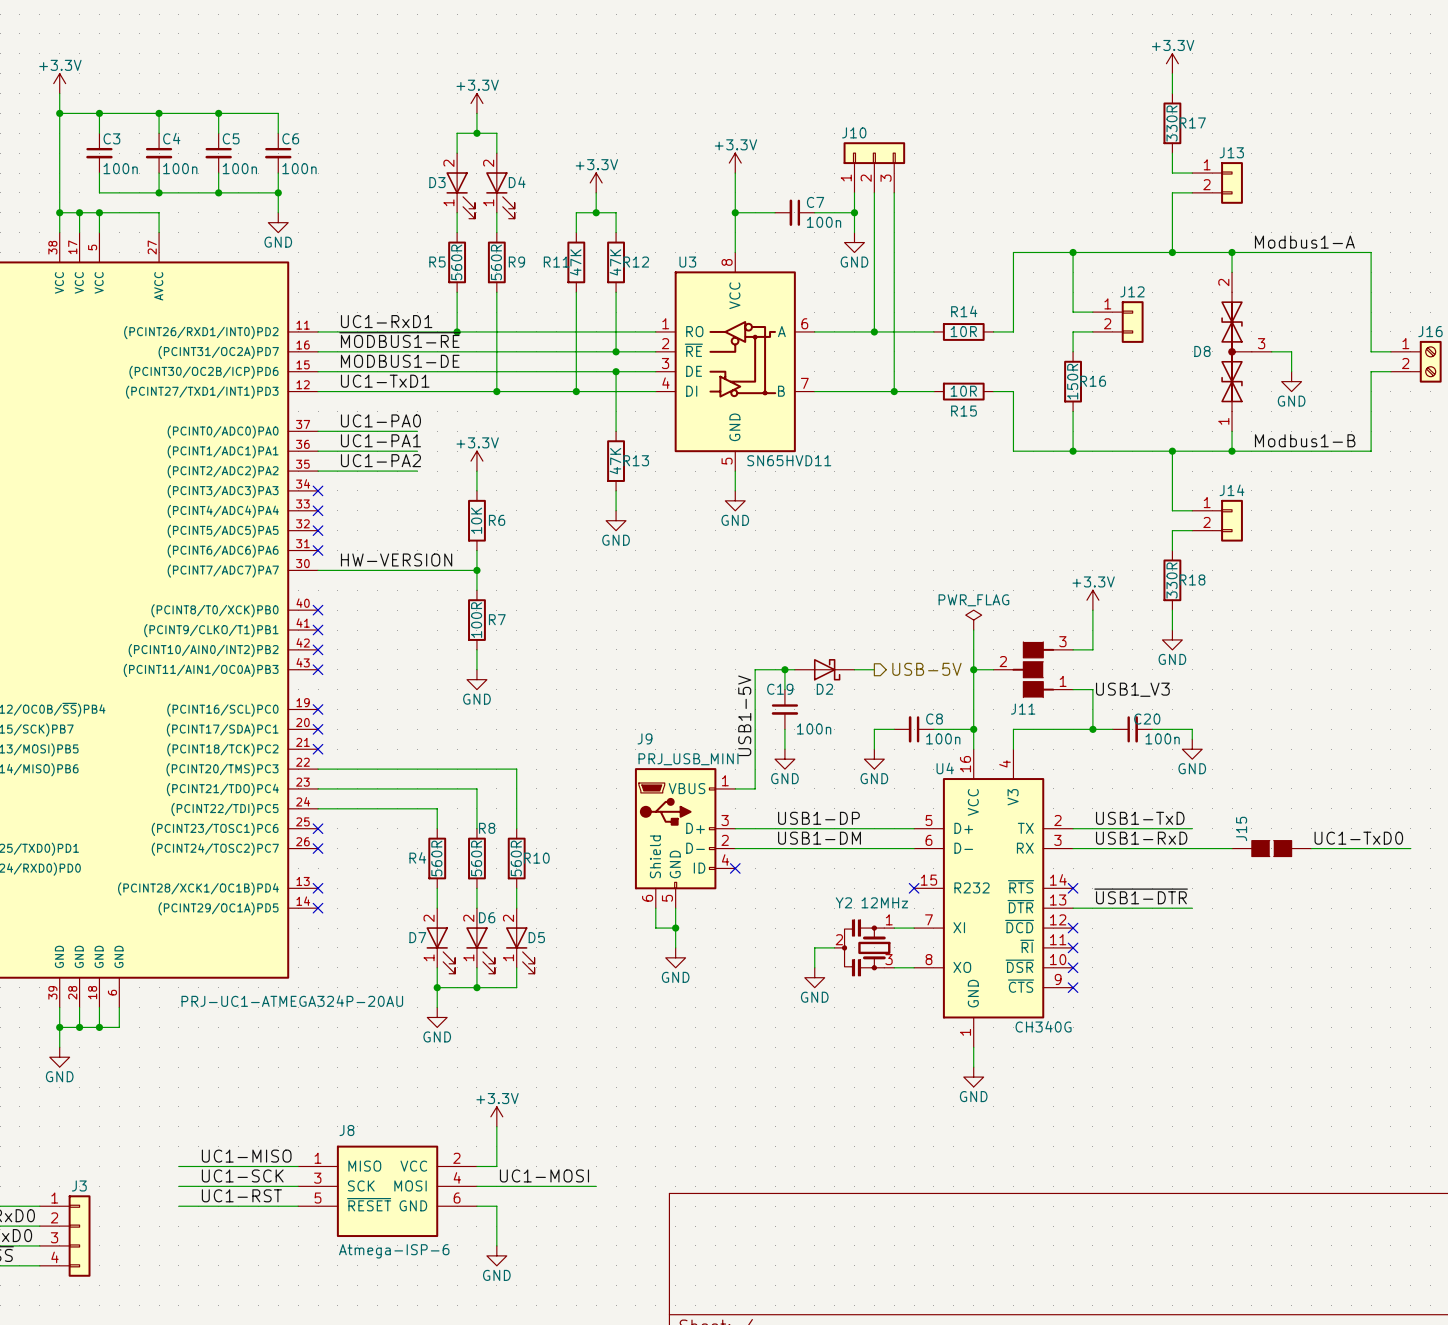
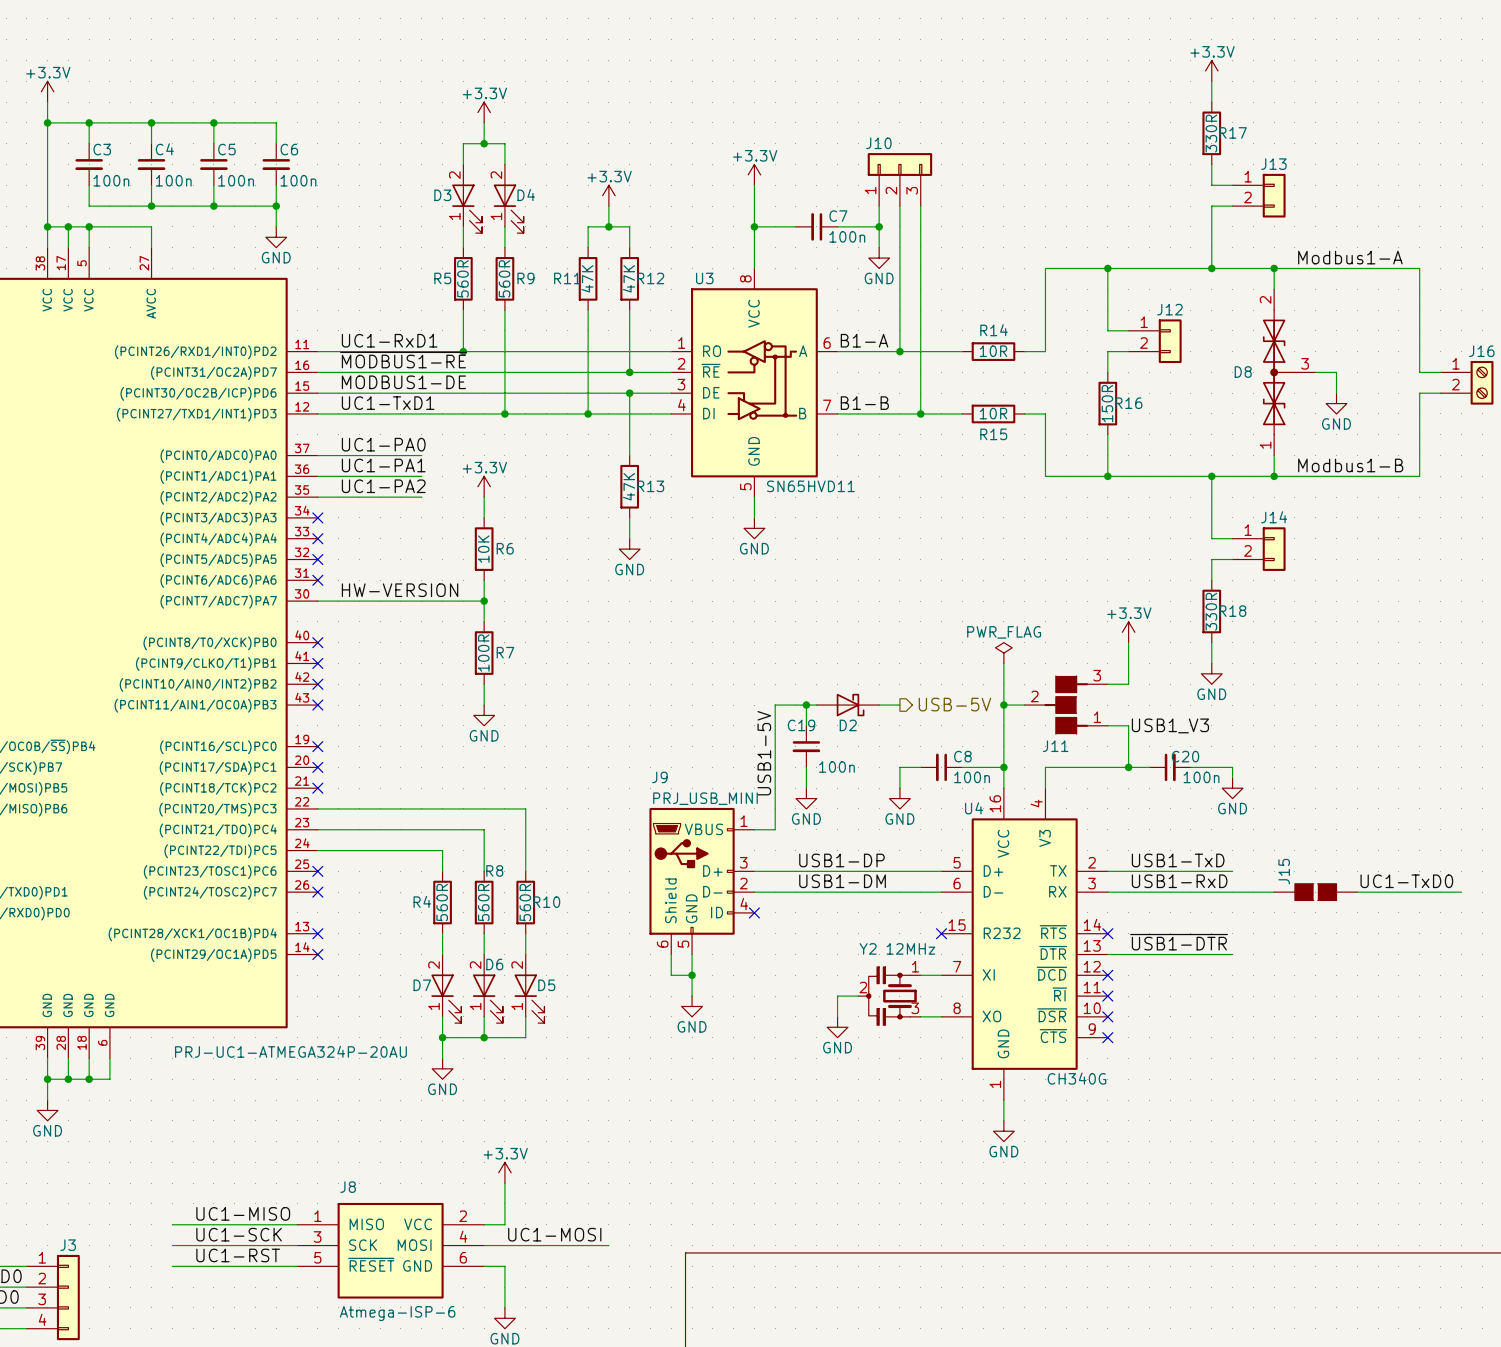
label: none -> B1-A (864, 340)
label: none -> B1-B (864, 403)

